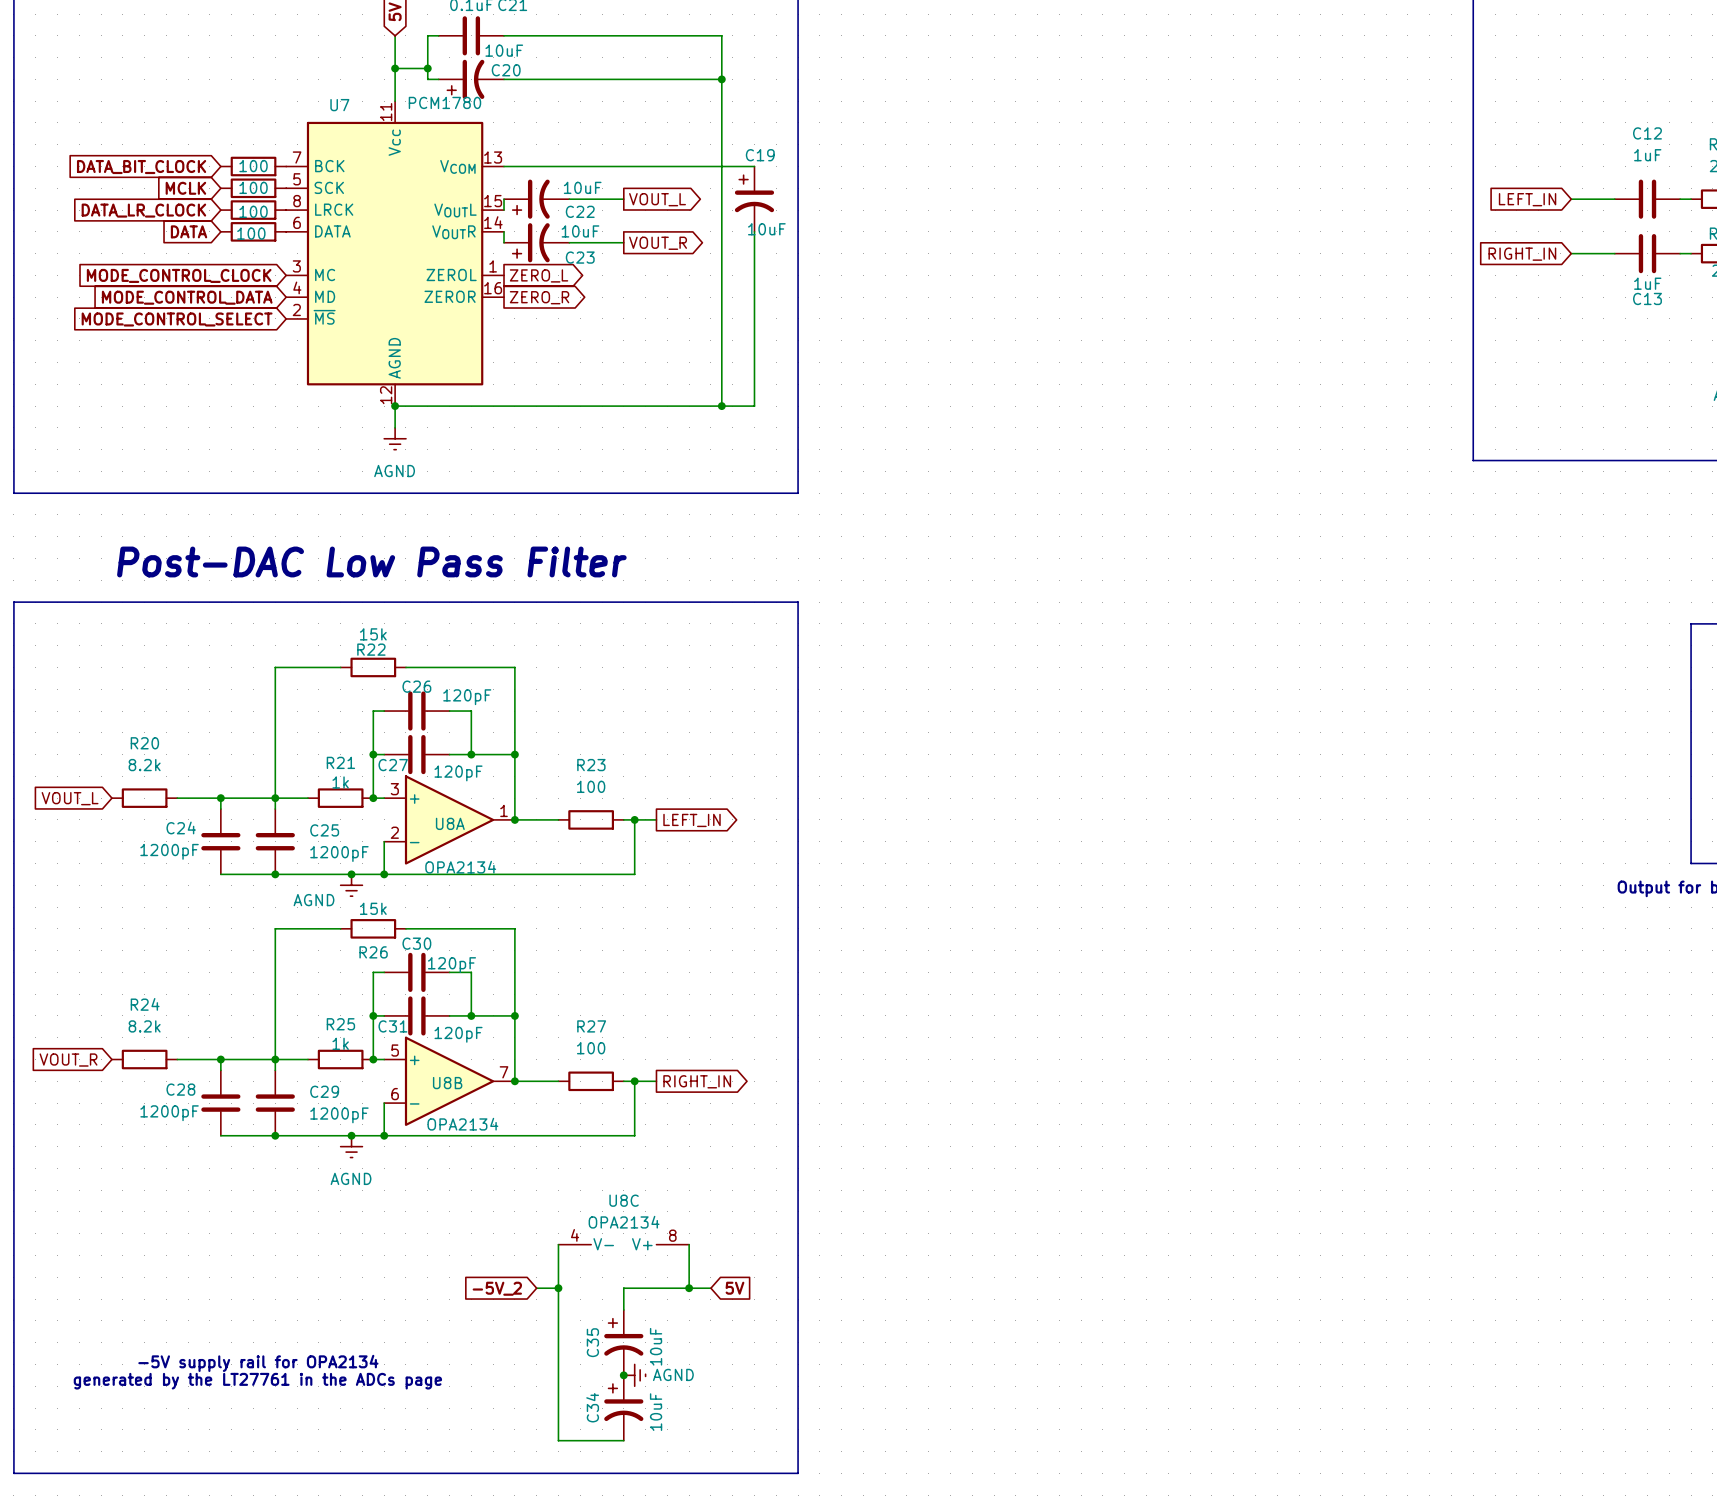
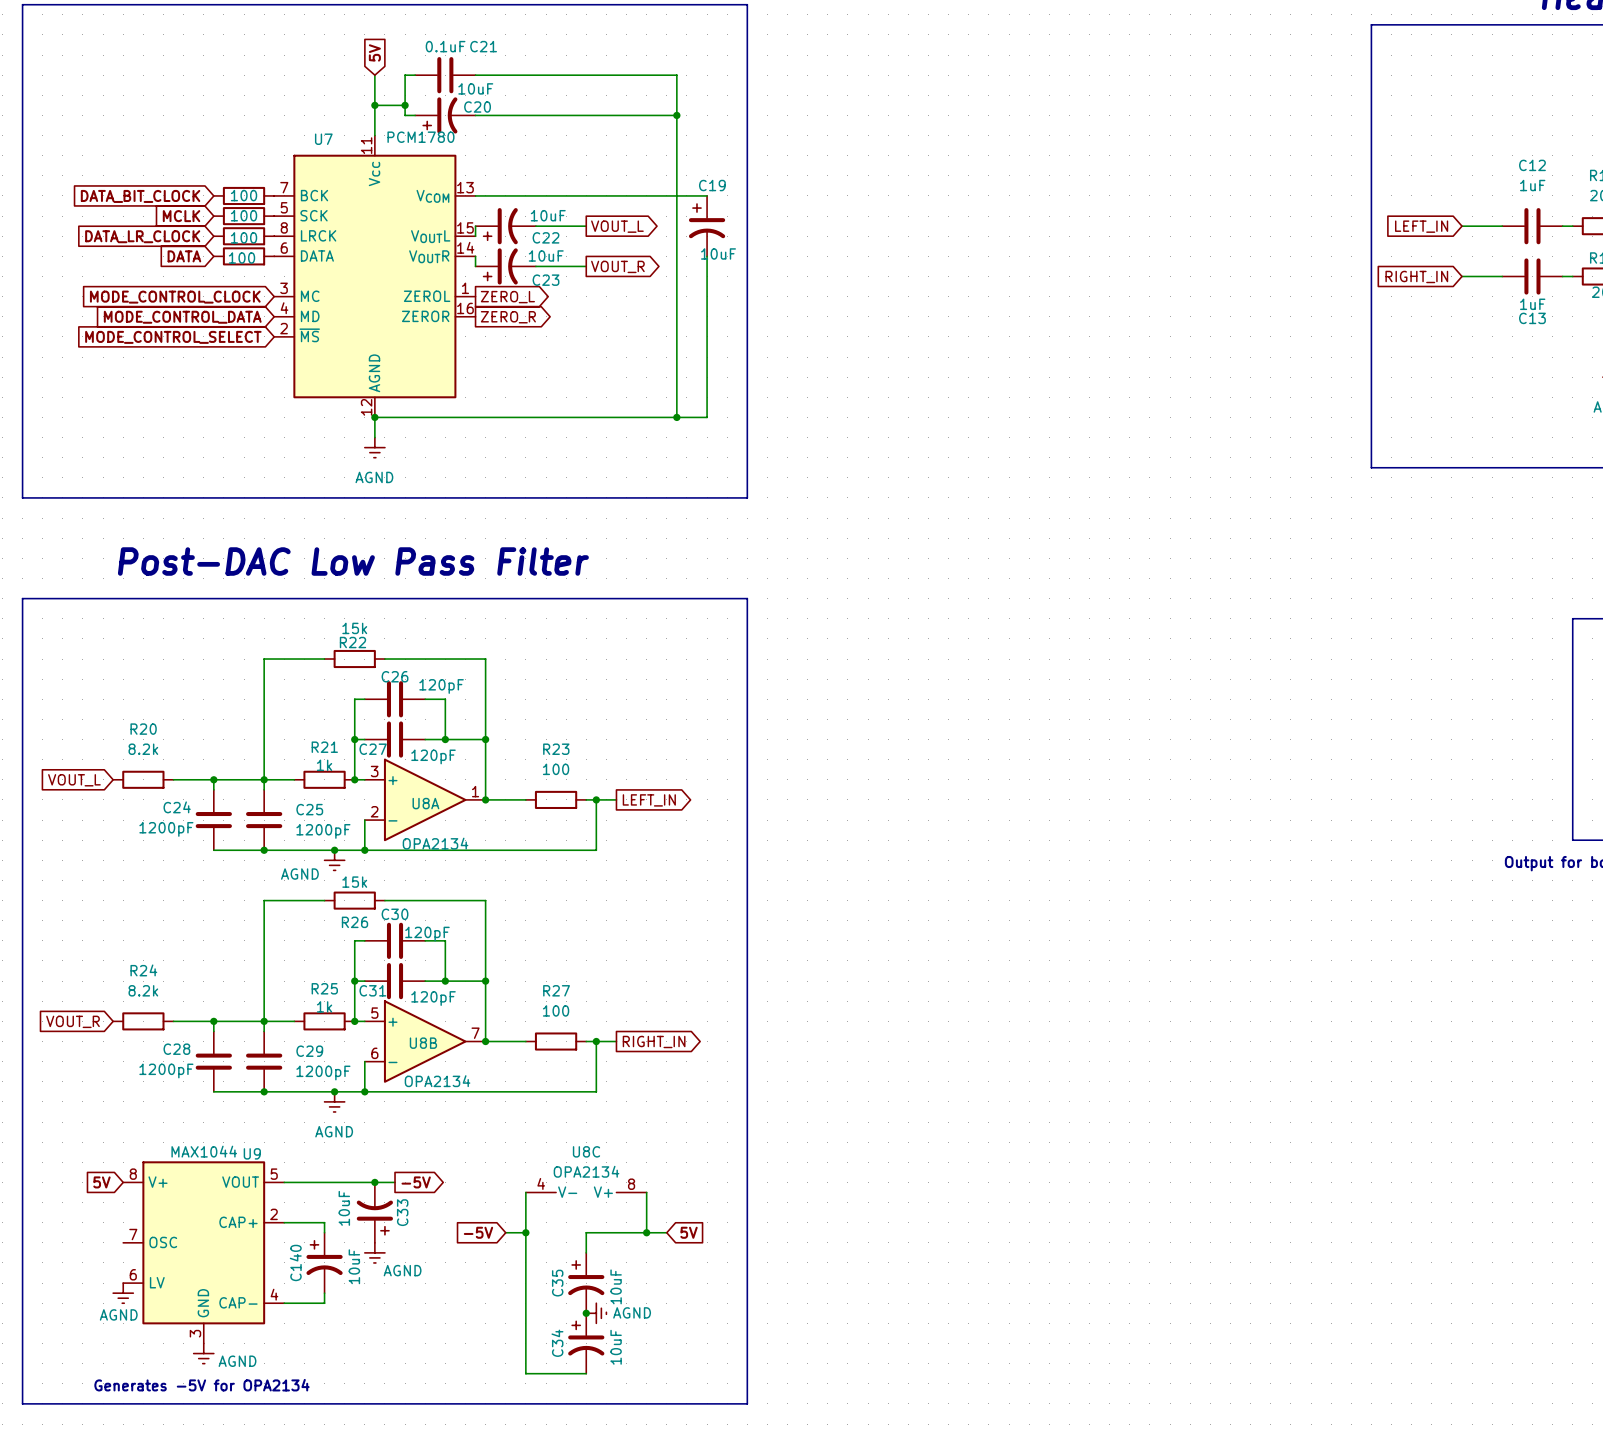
global label: none -> 5V (101, 1182)
wire: none -> (284, 1182) (395, 1182)
junction: none -> (374, 1182)
global label: none -> -5V (416, 1182)
C33: none -> 10uF (374, 1212)
wire: none -> (284, 1222) (324, 1222) (324, 1232)
global label: -5V_2 (497, 1288) -> -5V (478, 1232)
U9: none -> MAX1044 (203, 1252)
power symbol: none -> AGND (374, 1252)
C140: none -> 10uF (324, 1262)
power symbol: none -> AGND (123, 1293)
wire: none -> (324, 1293) (324, 1303) (284, 1303)
text: -5V supply rail for OPA2134 (258, 1363) -> none
text: generated by the LT27761 in the ADCs page (257, 1381) -> none
power symbol: none -> AGND (203, 1353)
text: none -> Generates -5V for OPA2134 (201, 1385)

